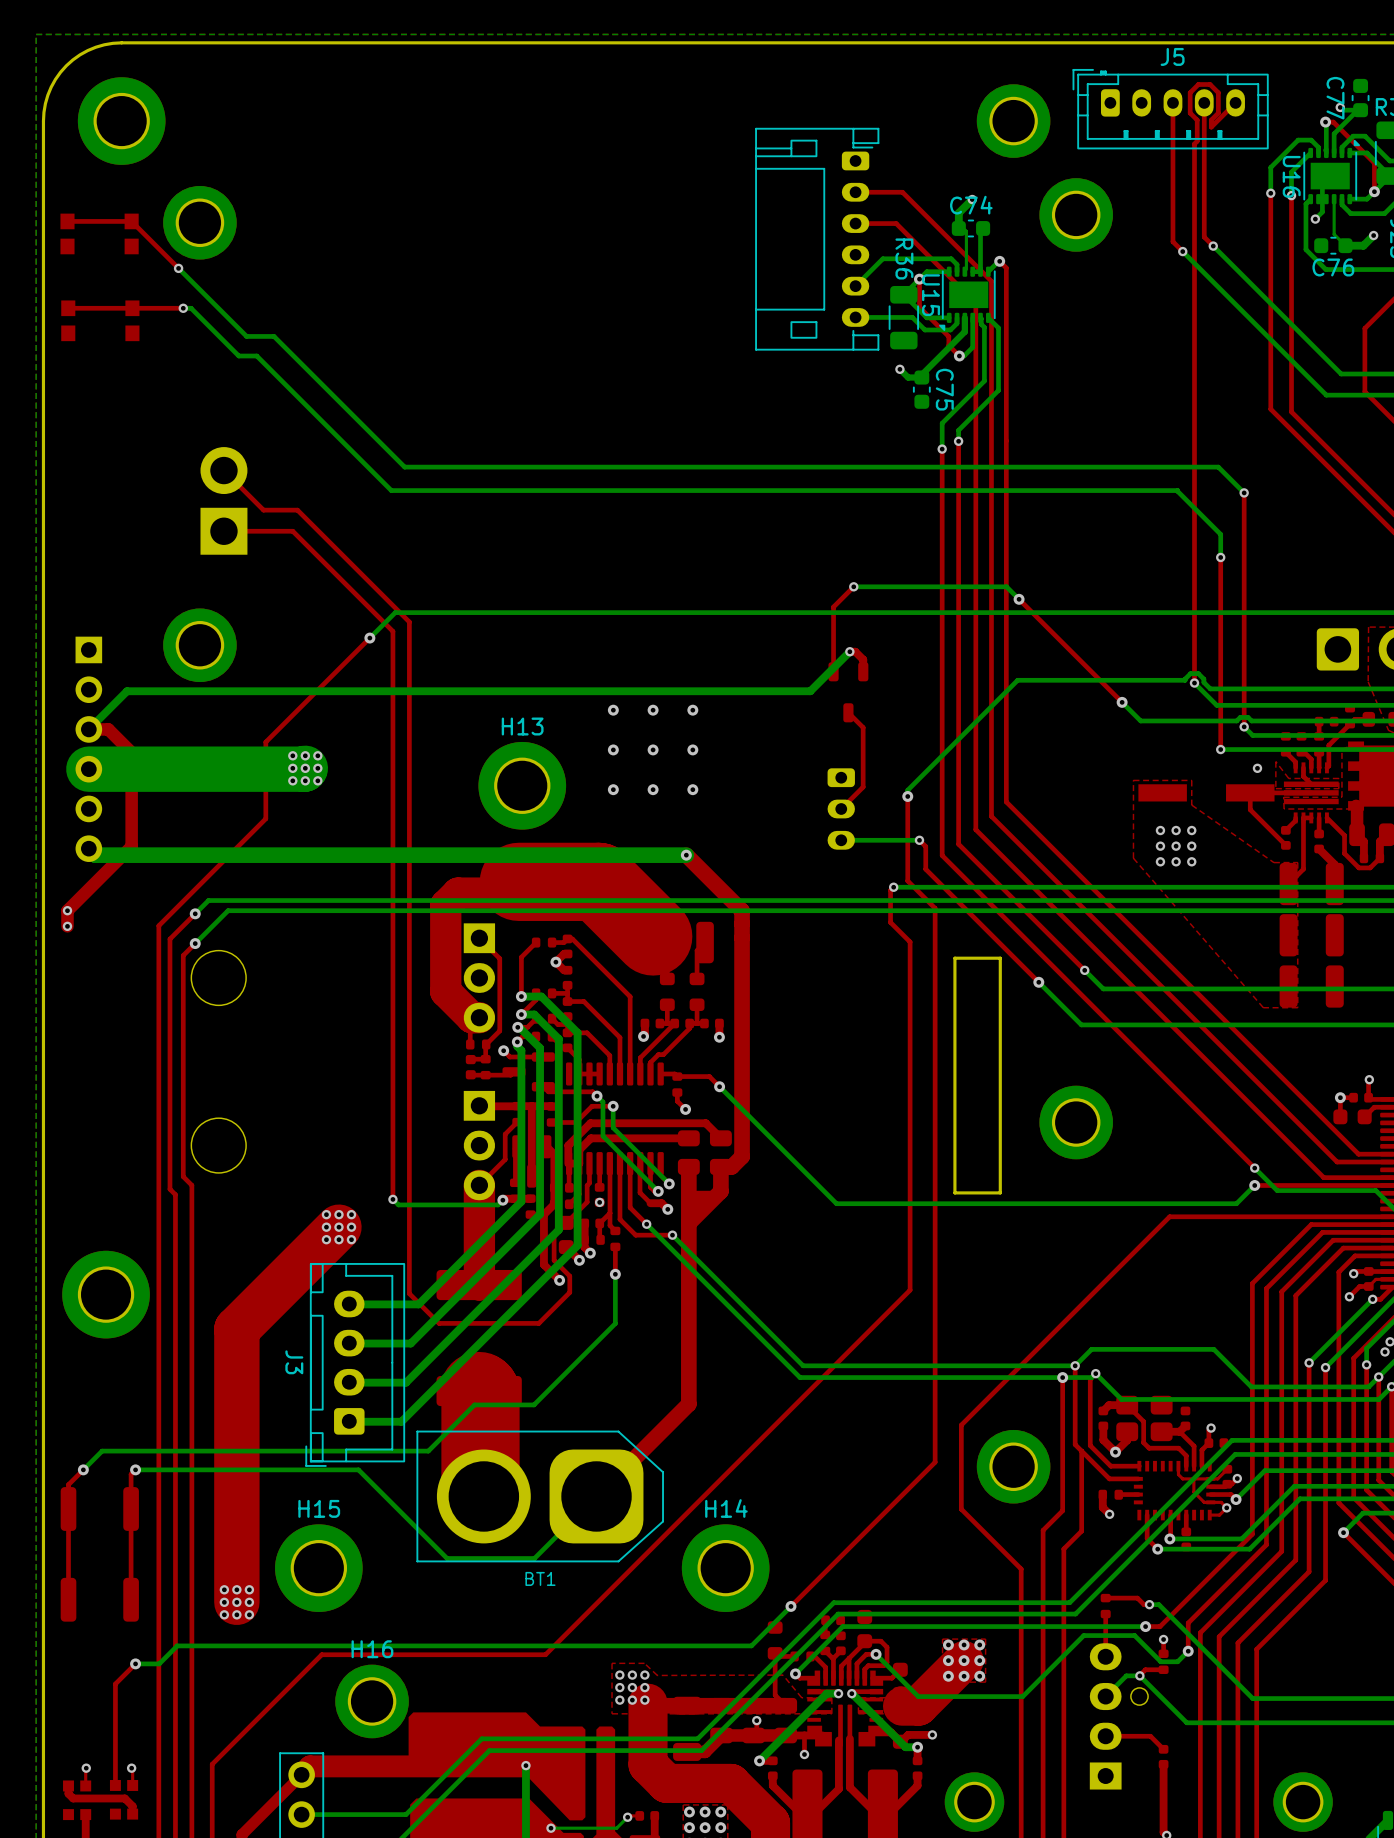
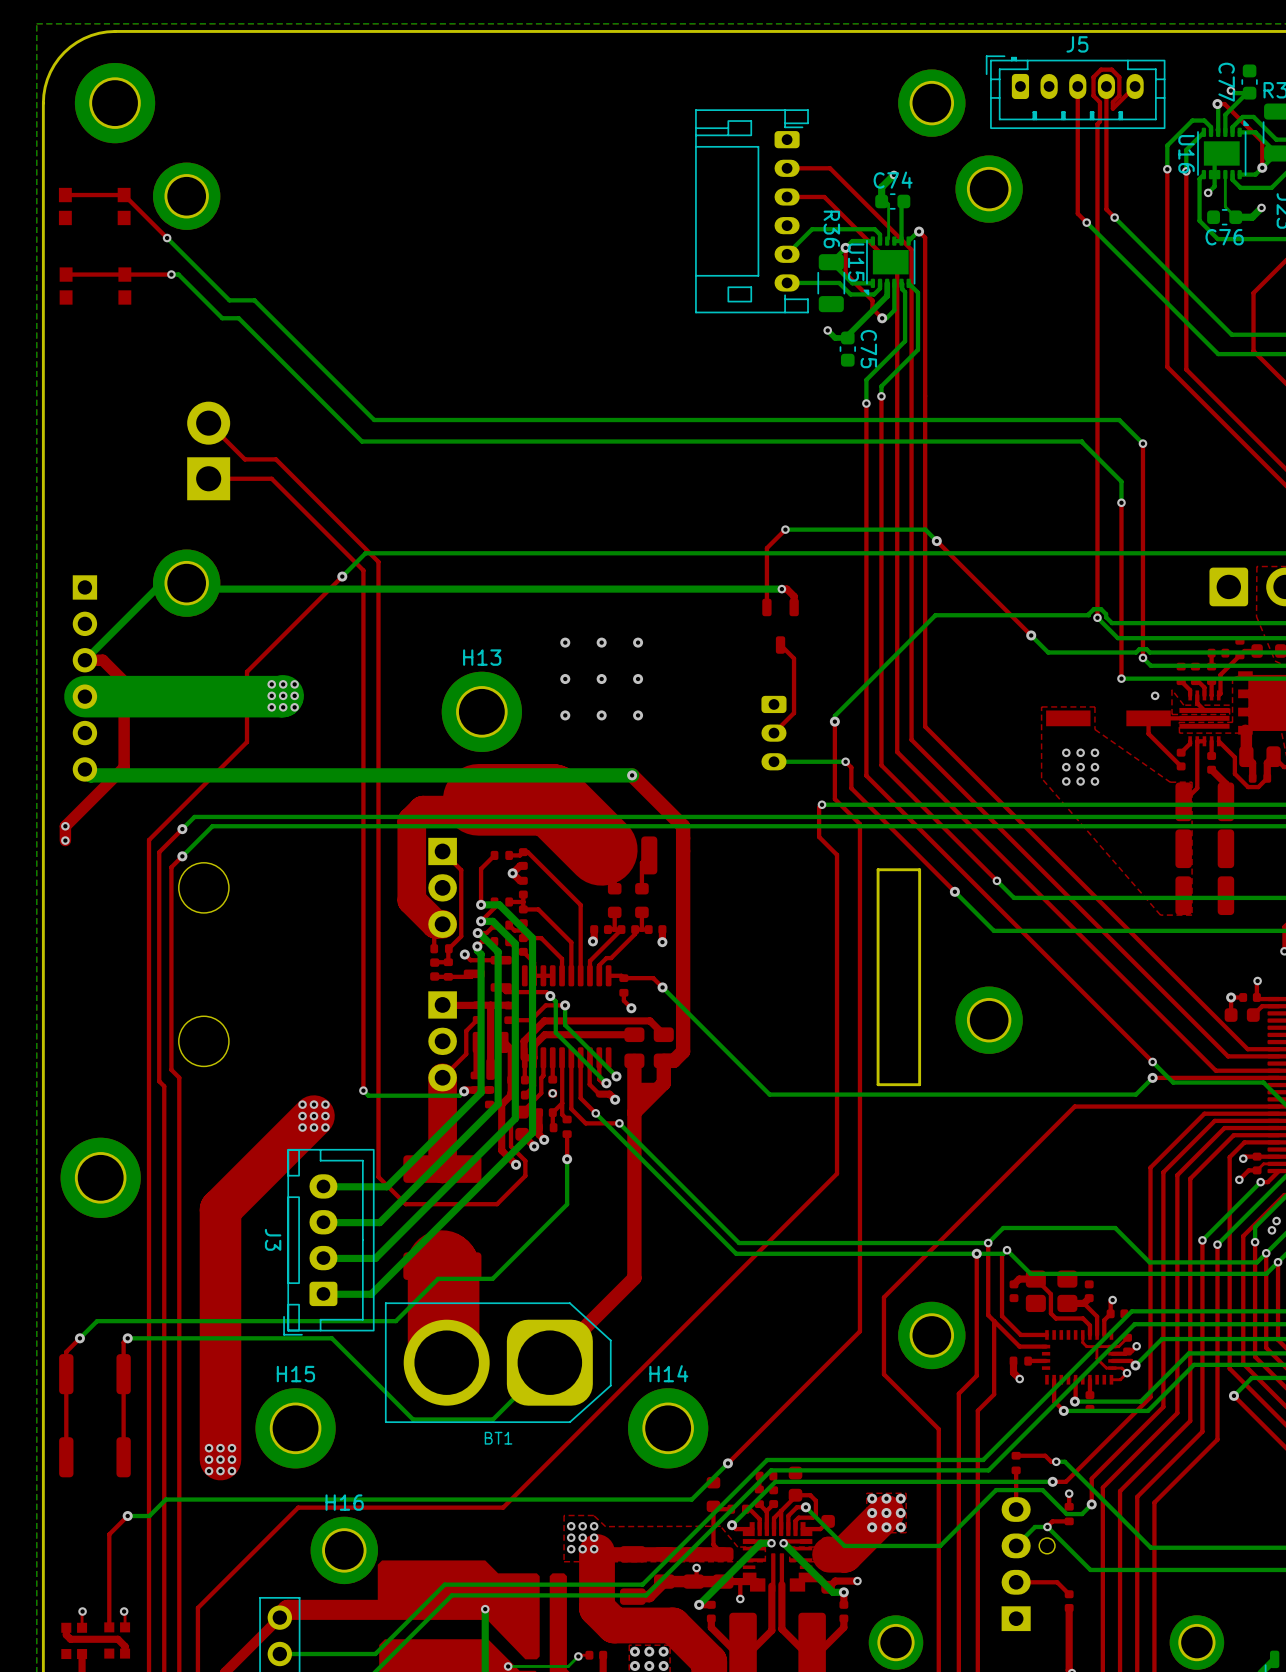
bottom track: (849, 651) (810, 691) (127, 691) -> (781, 589) (156, 589) (119, 625)
top track: (1103, 1425) (1103, 1439) (1115, 1452) (1127, 1440) (1127, 1431) -> none
via: (1115, 1452) -> none

